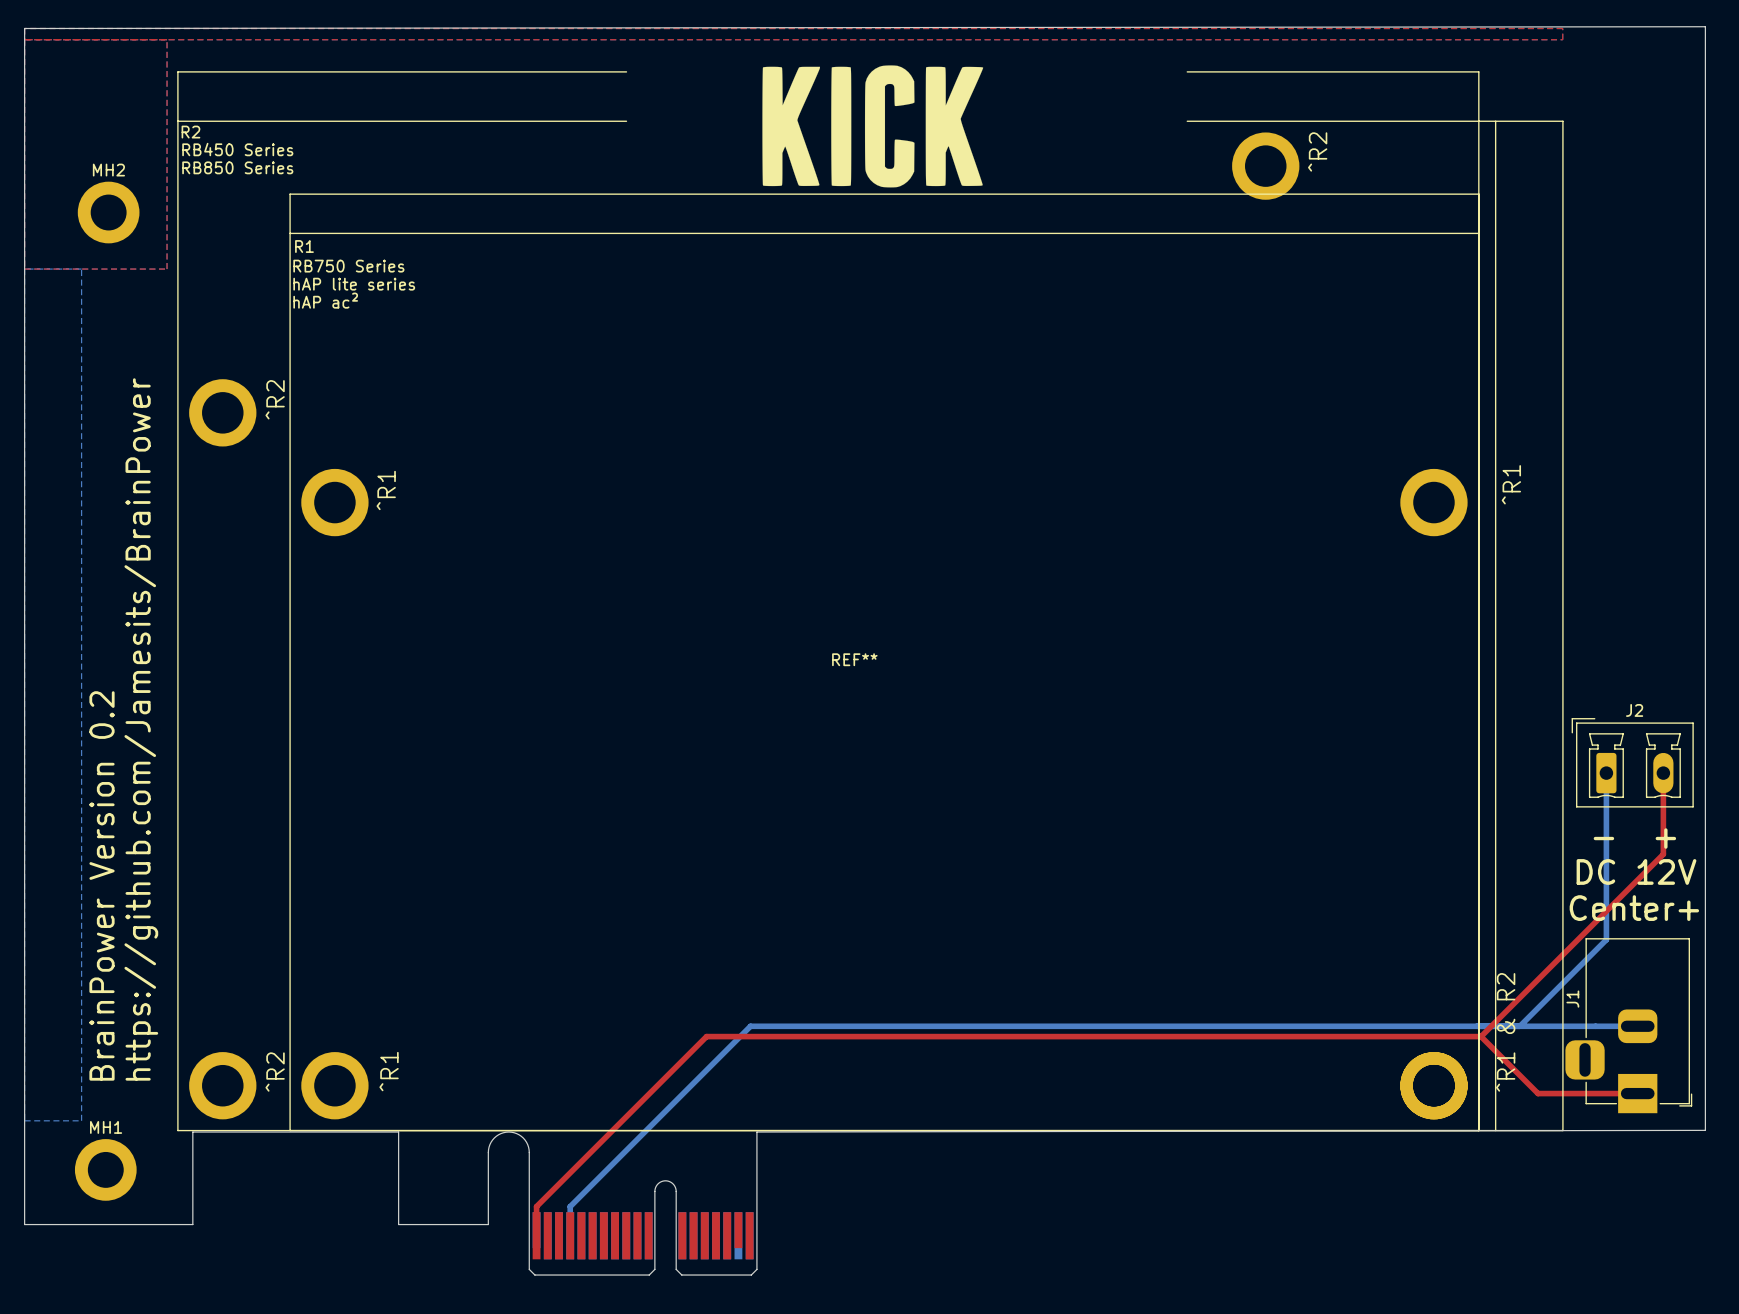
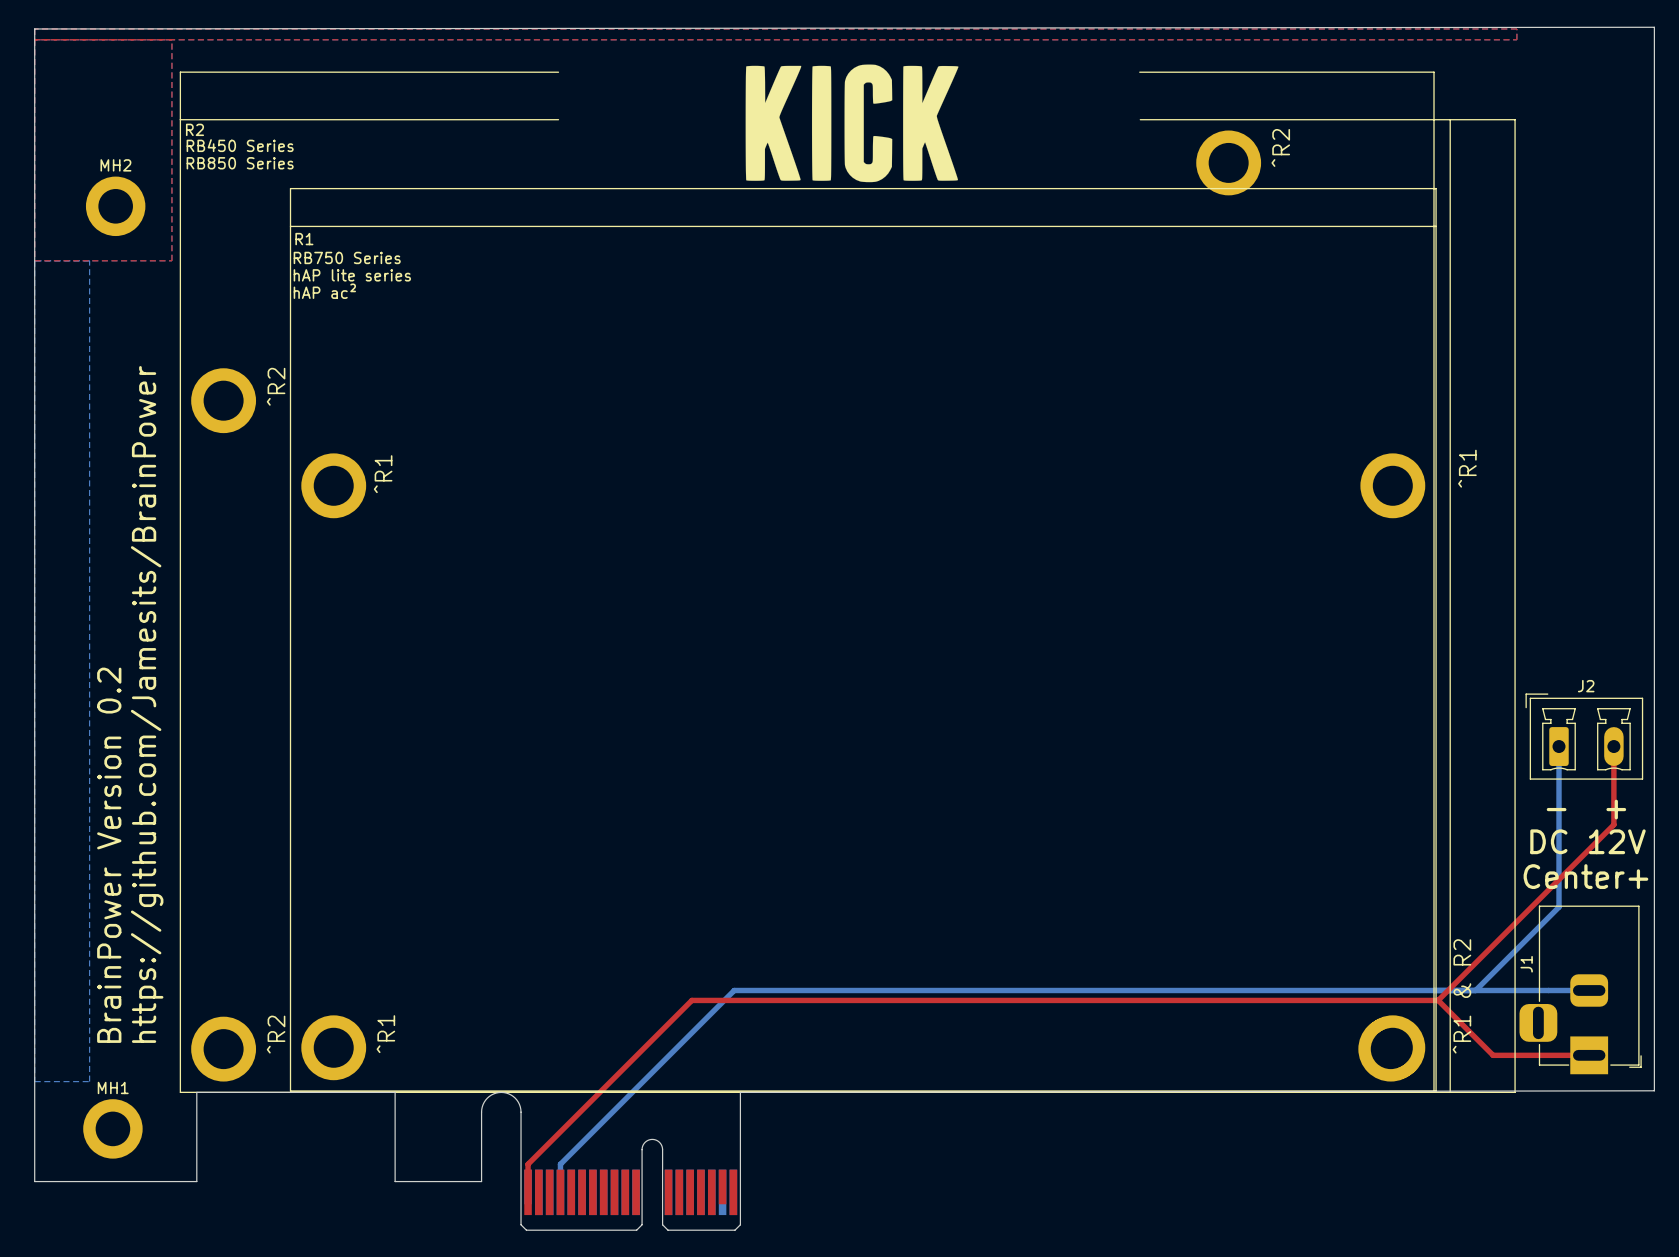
R2 footprint: [177, 71, 1564, 1132] -> [179, 71, 1516, 1093]

